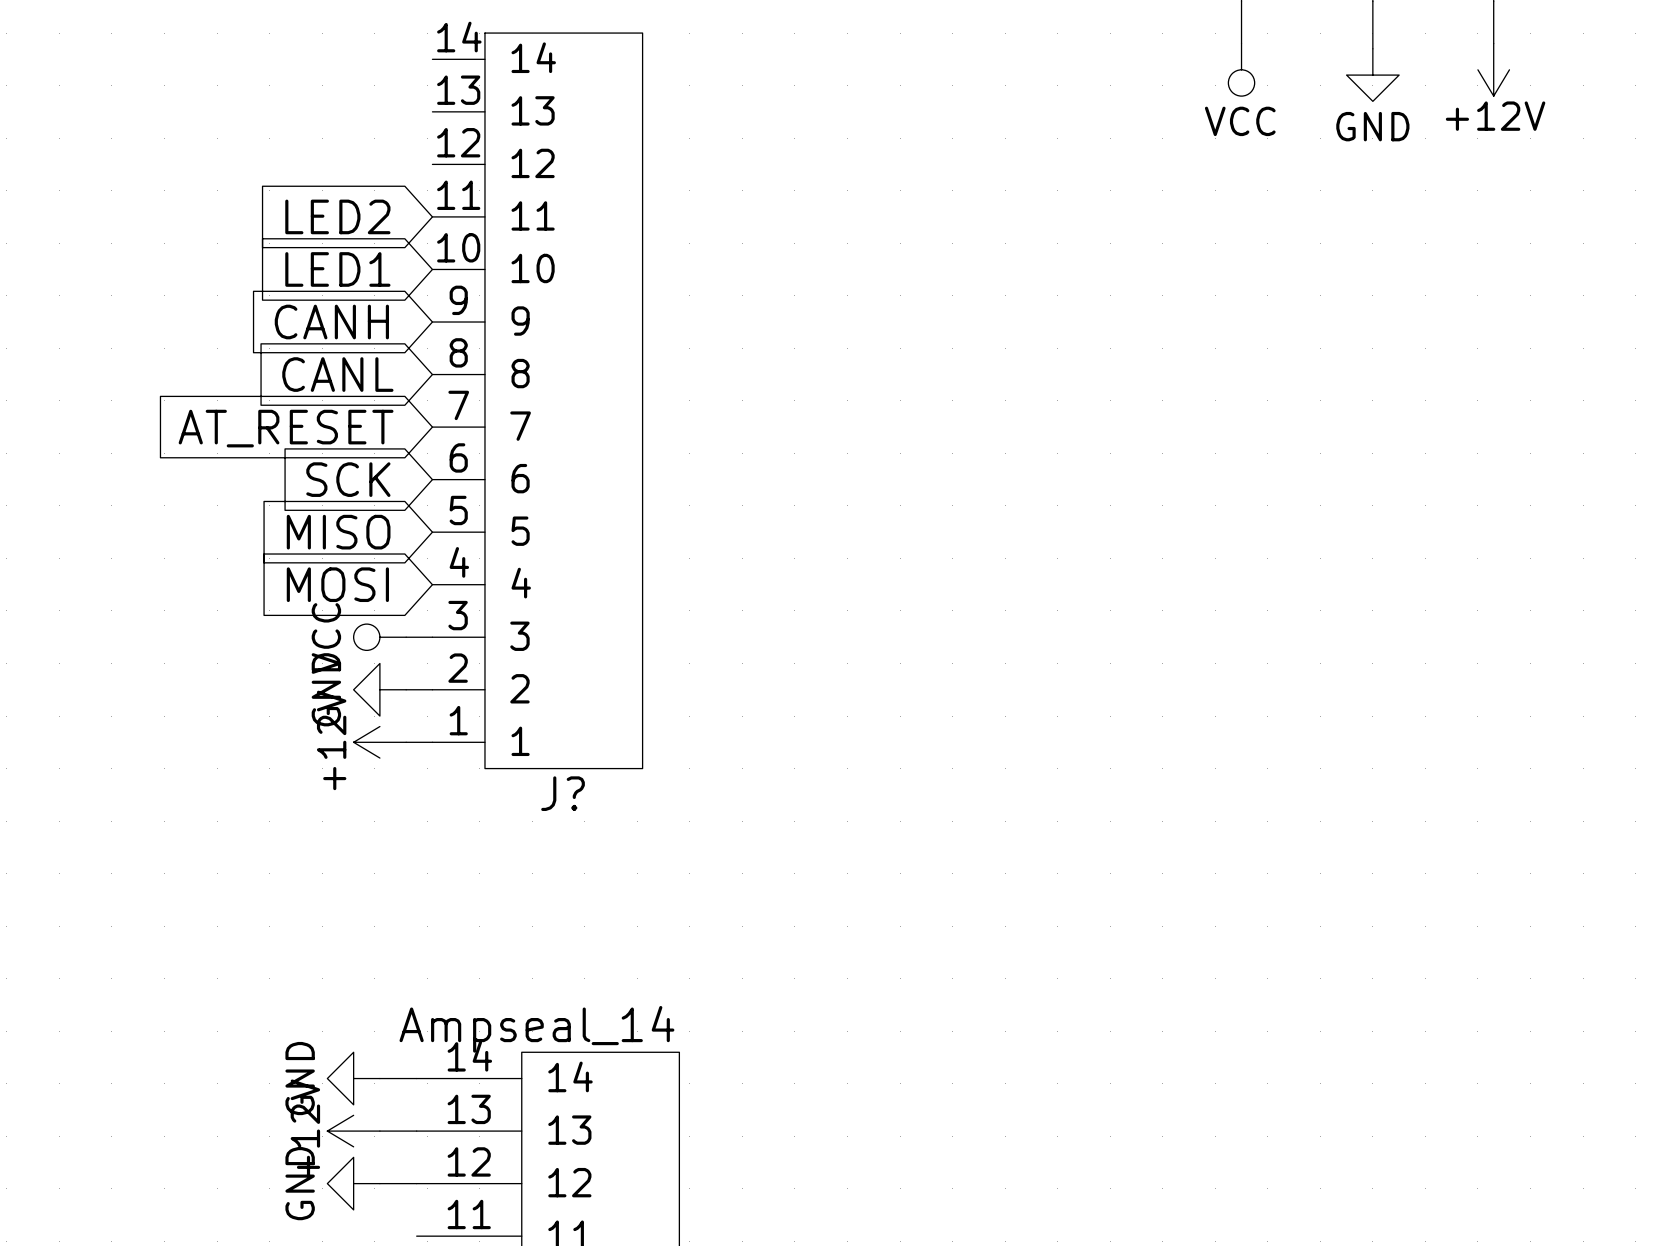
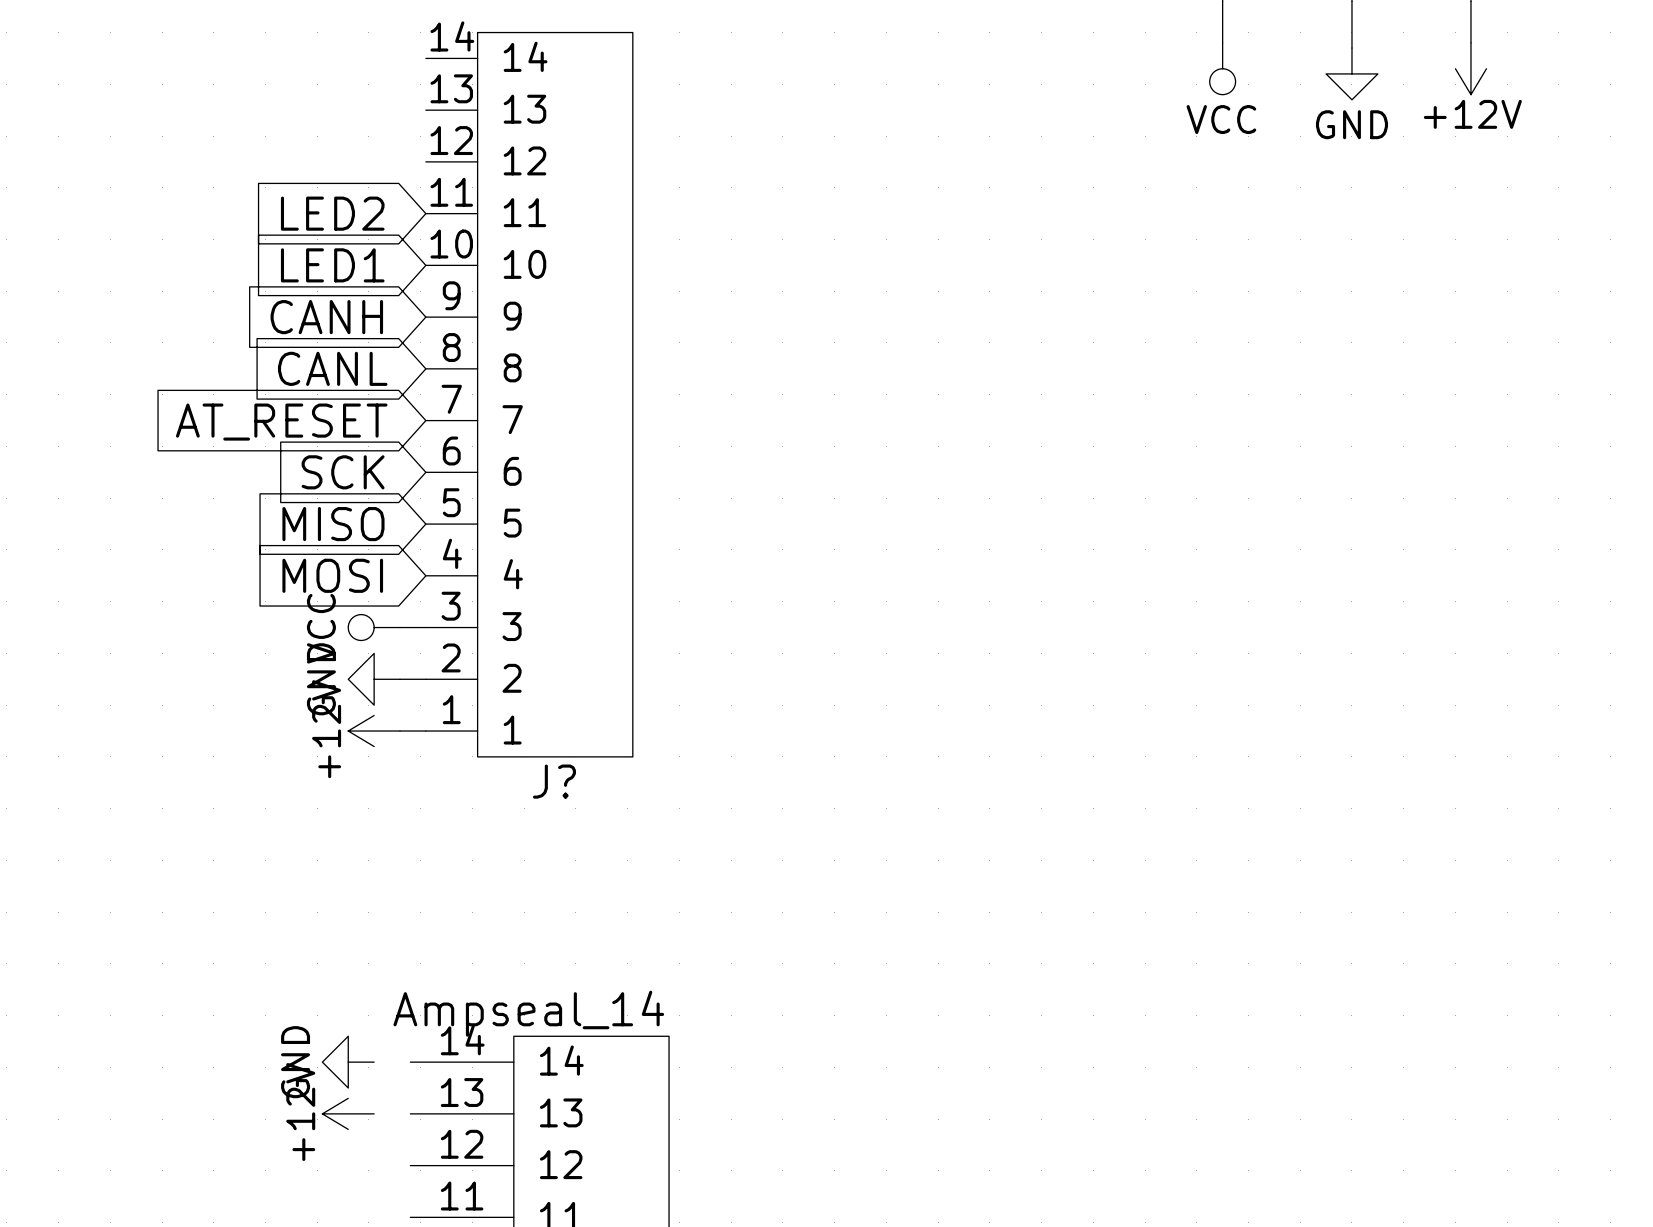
wire: (379, 1078) (416, 1078) -> none
wire: (379, 1131) (416, 1131) -> none
power symbol: GND (353, 1183) -> none
wire: (379, 1183) (416, 1183) -> none

